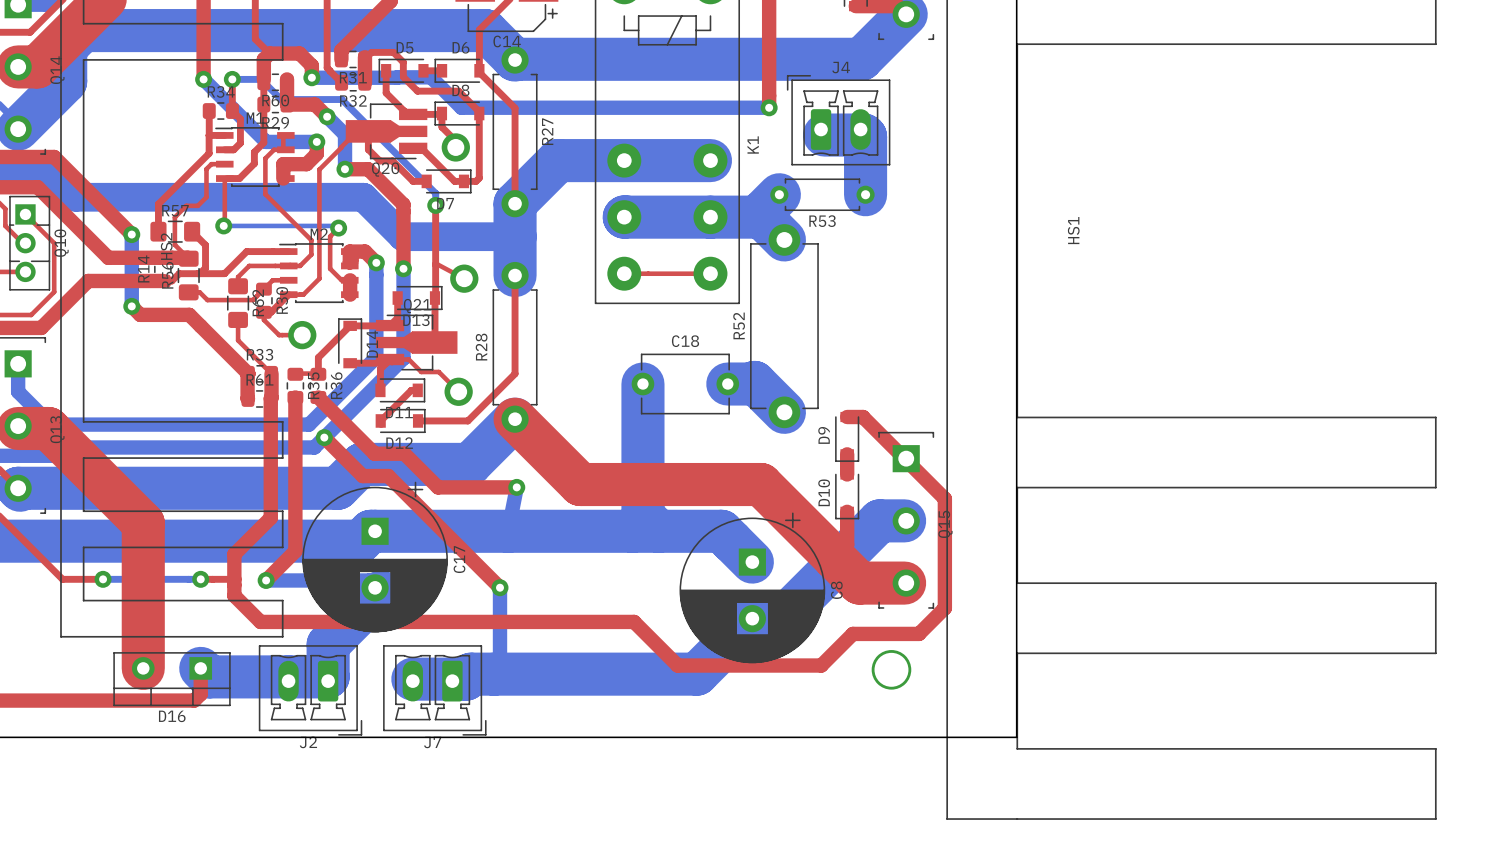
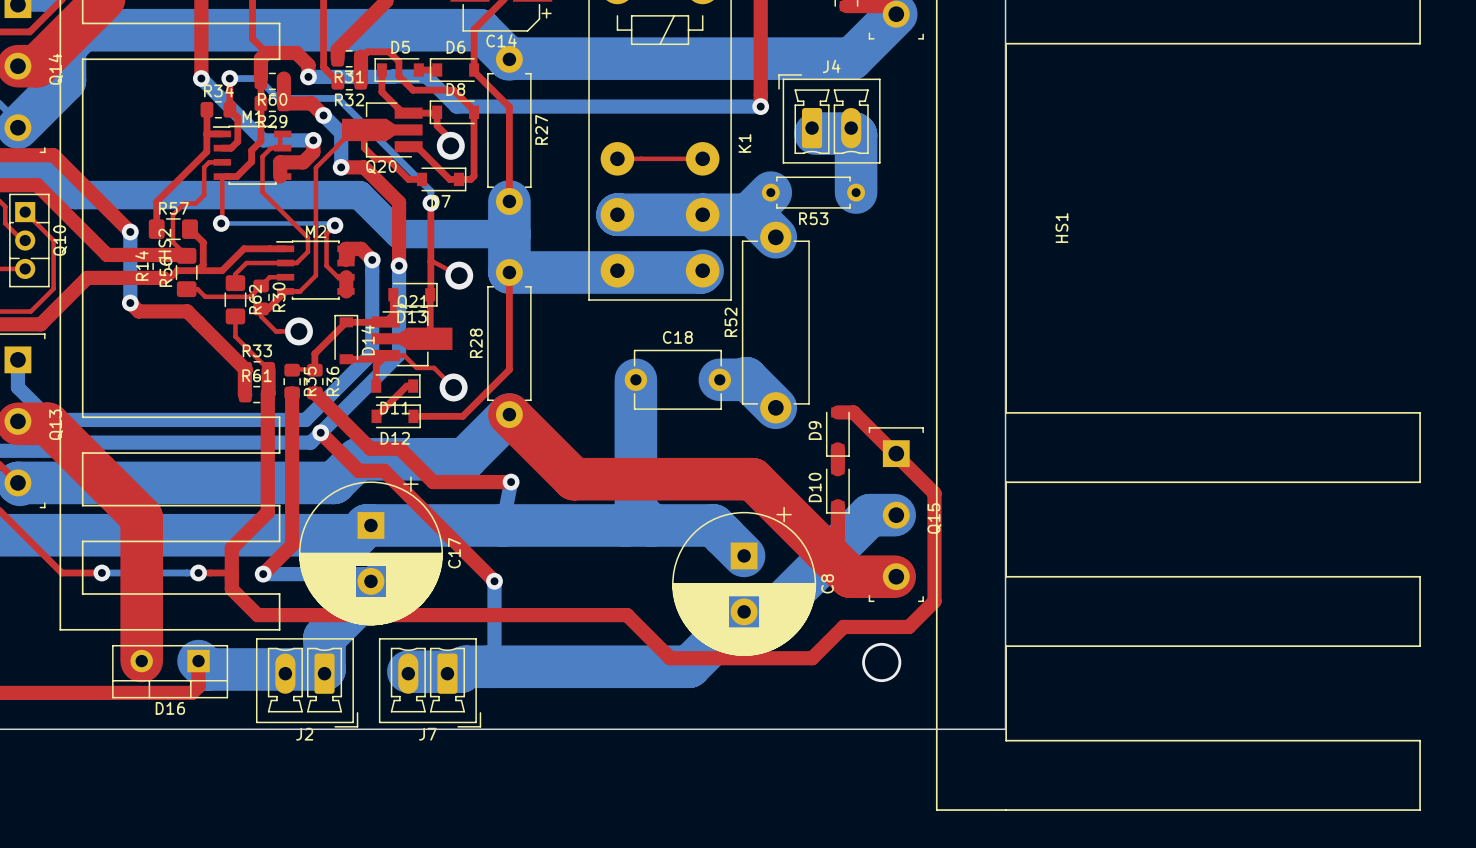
bottom track: (710, 160) (558, 160) (515, 203) -> none
top track: (624, 273) (710, 273) -> (617, 158) (702, 158)
bottom track: none -> (702, 270) (700, 272) (509, 272)

